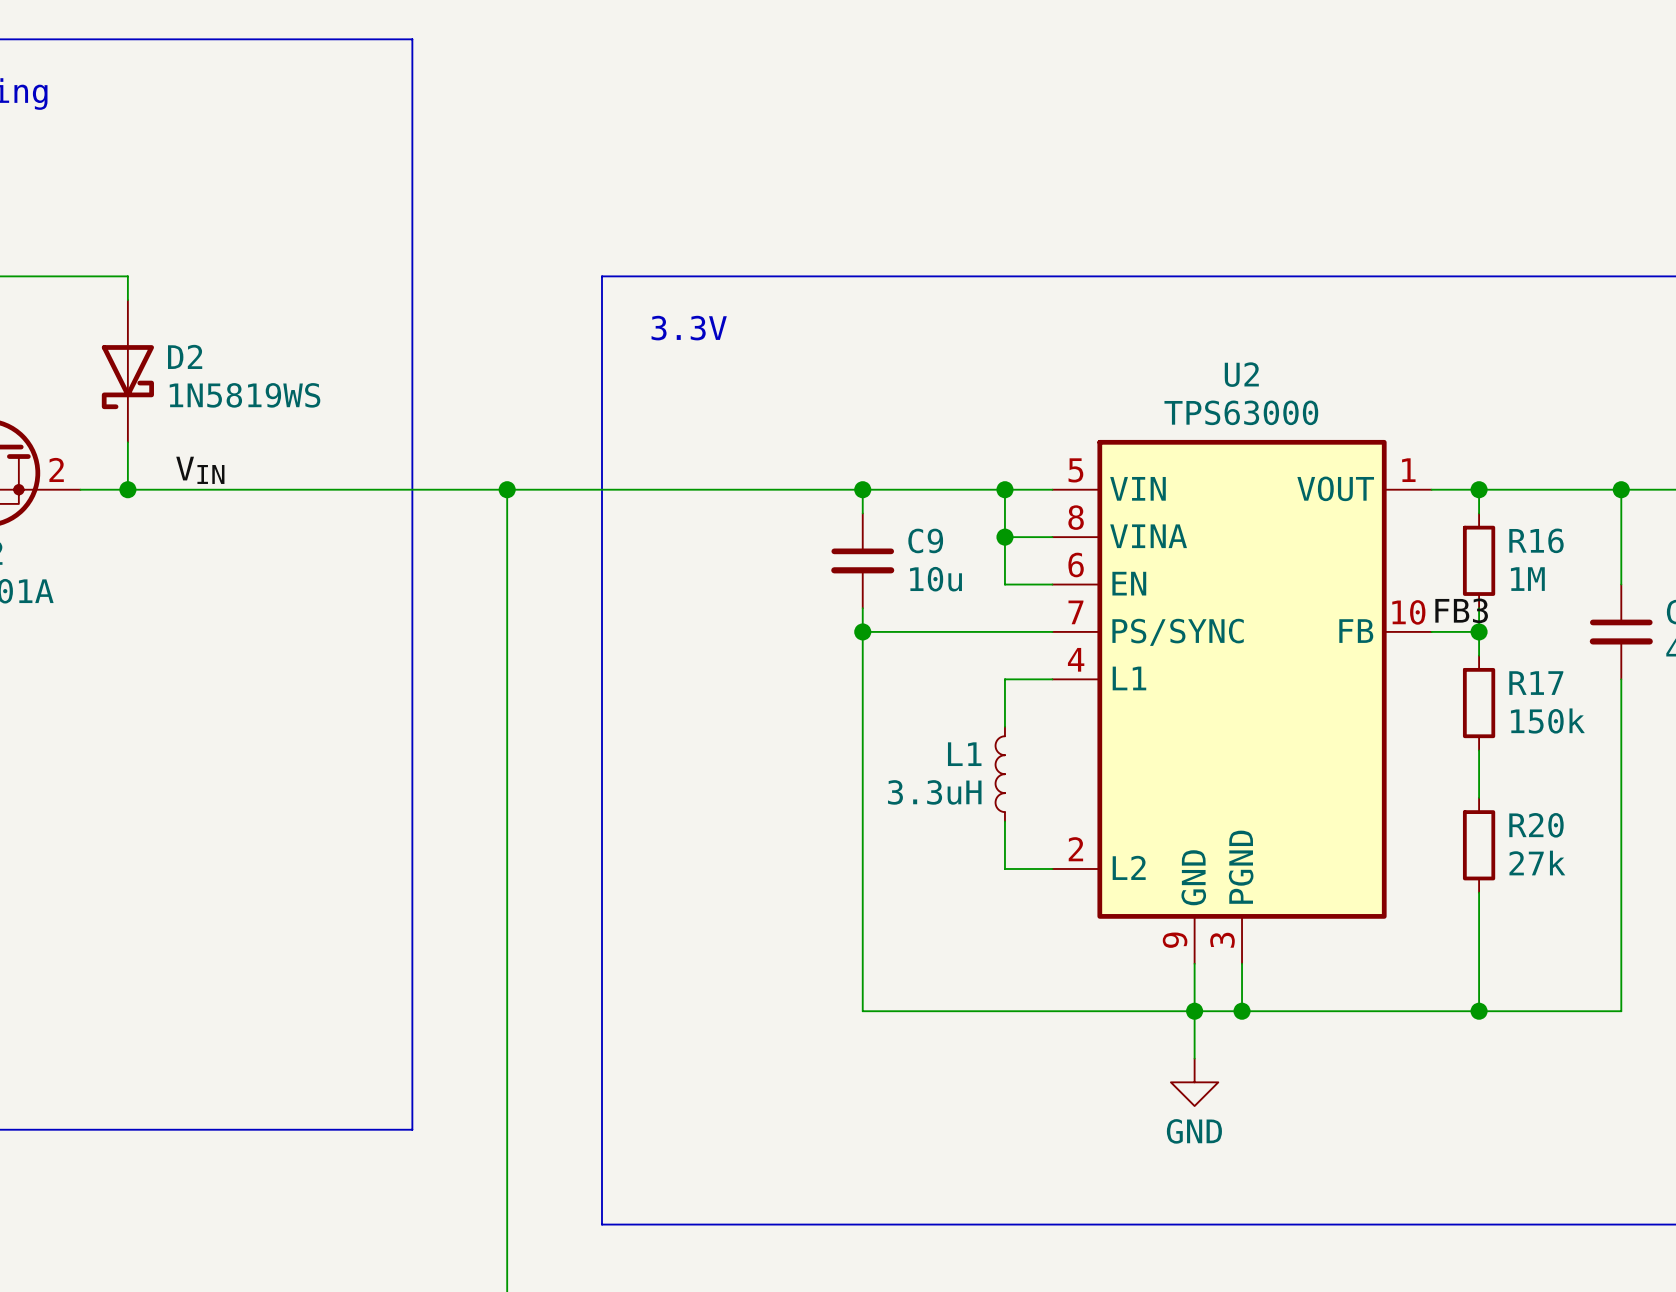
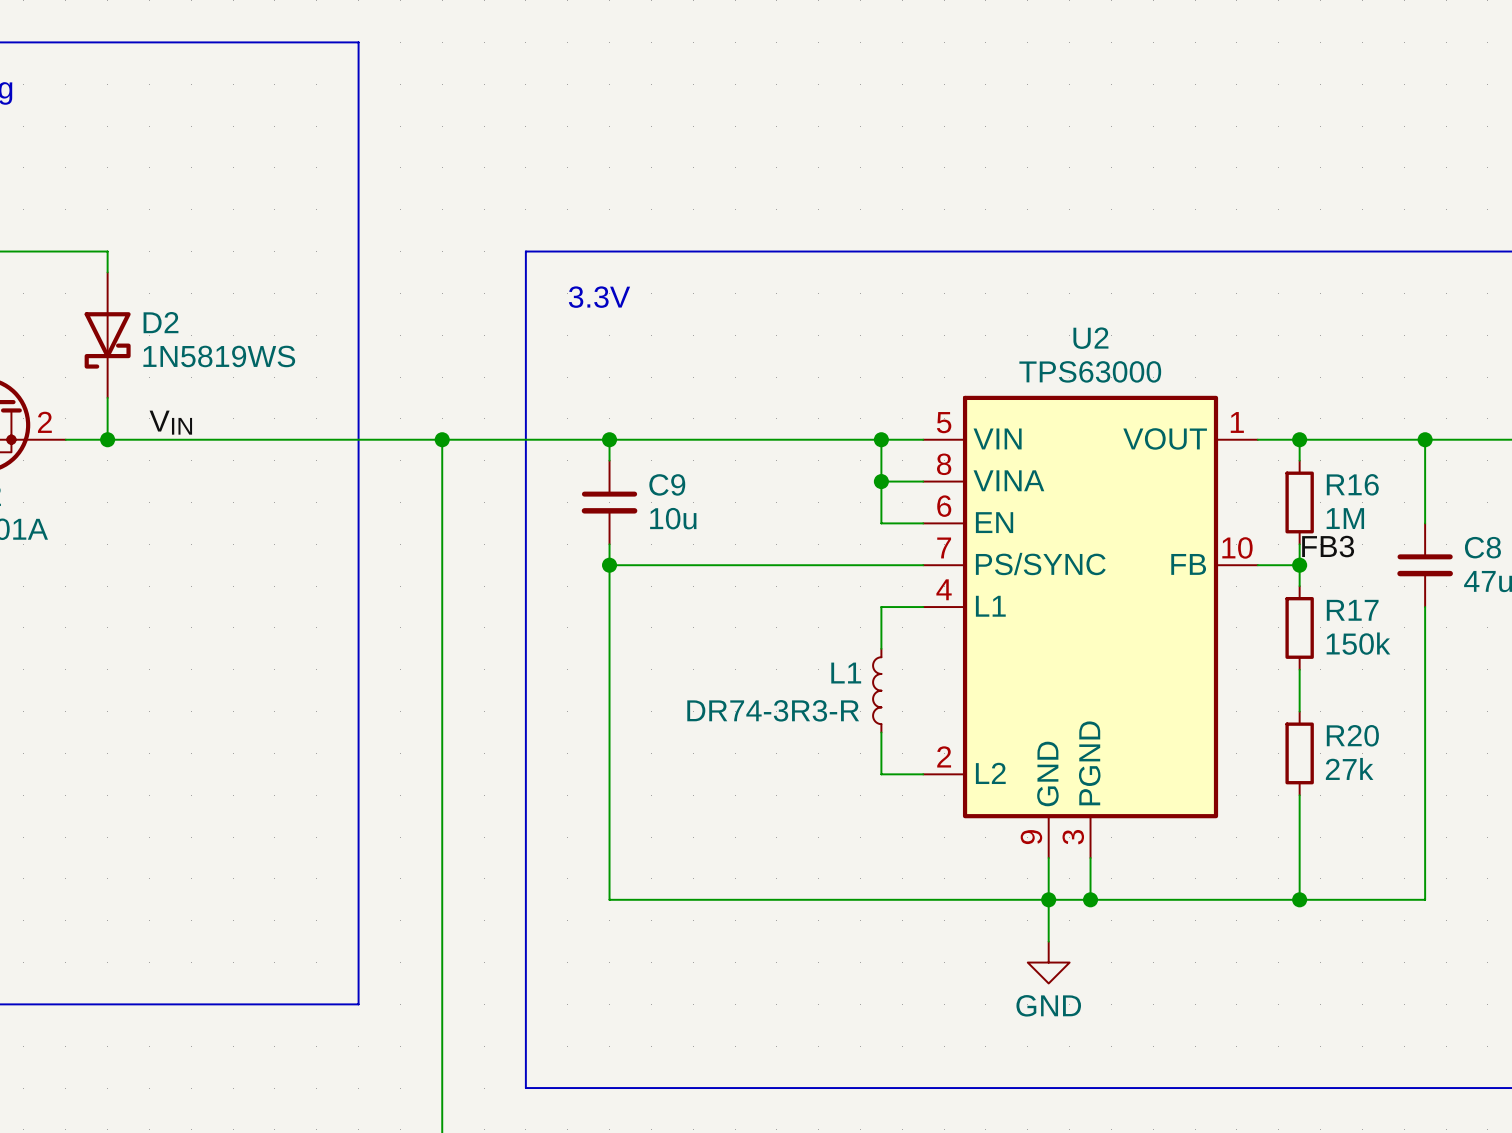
junction: none -> (609, 439)
wire: (862, 489) (862, 513) -> (609, 439) (609, 460)
junction: (862, 489) -> none
C9 position: (862, 560) -> (609, 502)
wire: (862, 608) (862, 1011) -> (609, 544) (609, 899) (755, 899)
label position: FB3 (1461, 610) -> FB3 (1328, 546)
wire: none -> (609, 565) (755, 565)
junction: none -> (609, 565)
junction: (862, 631) -> none
L1 value: 3.3uH (934, 792) -> DR74-3R3-R (773, 710)

